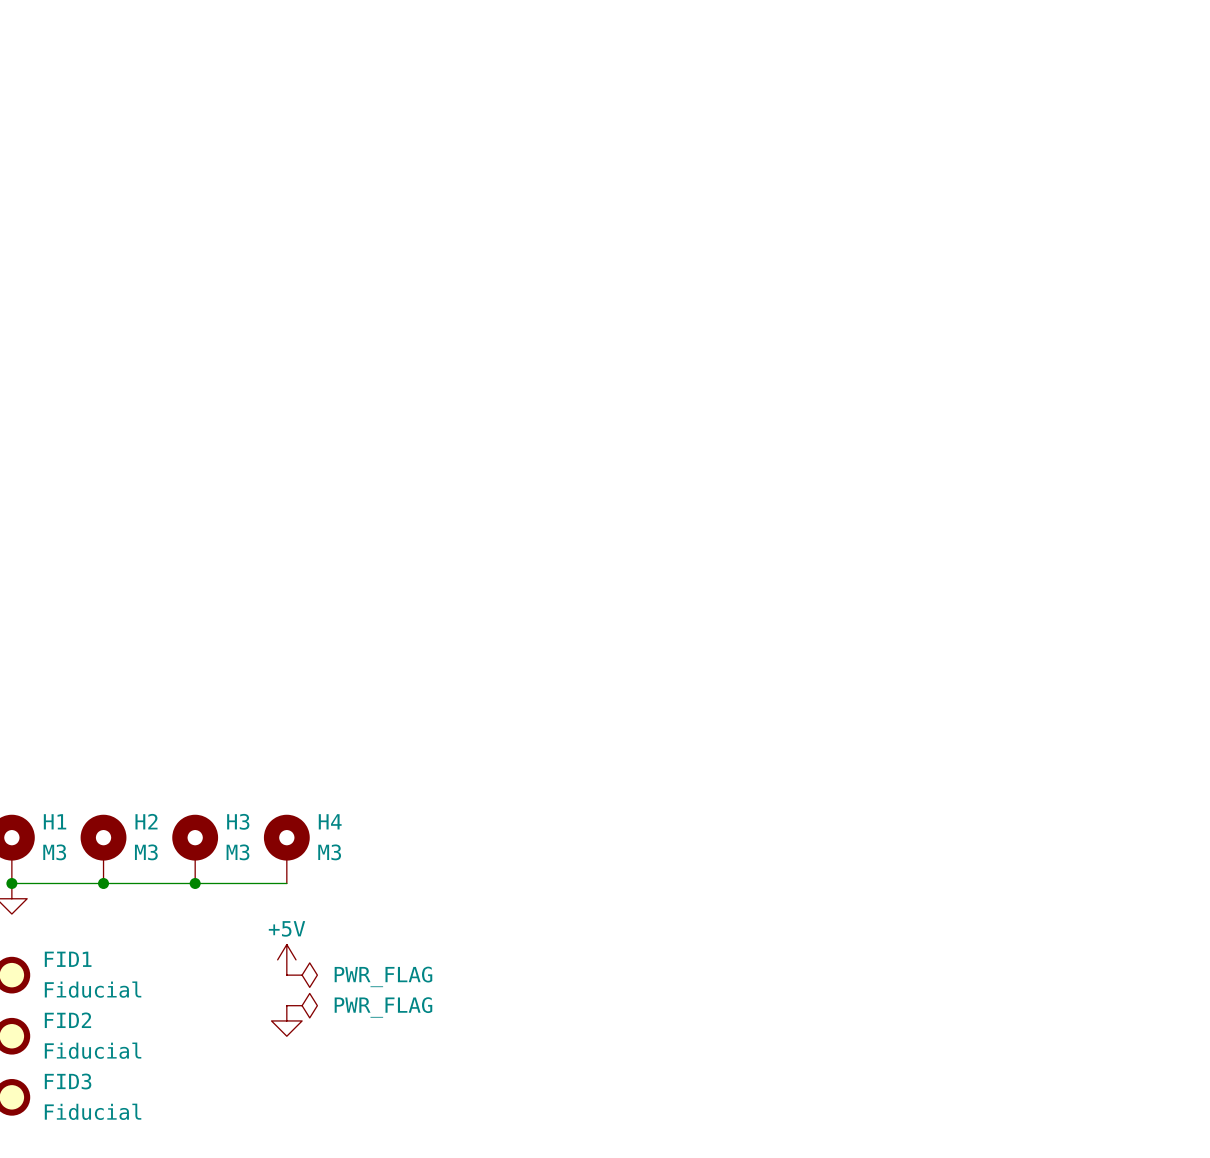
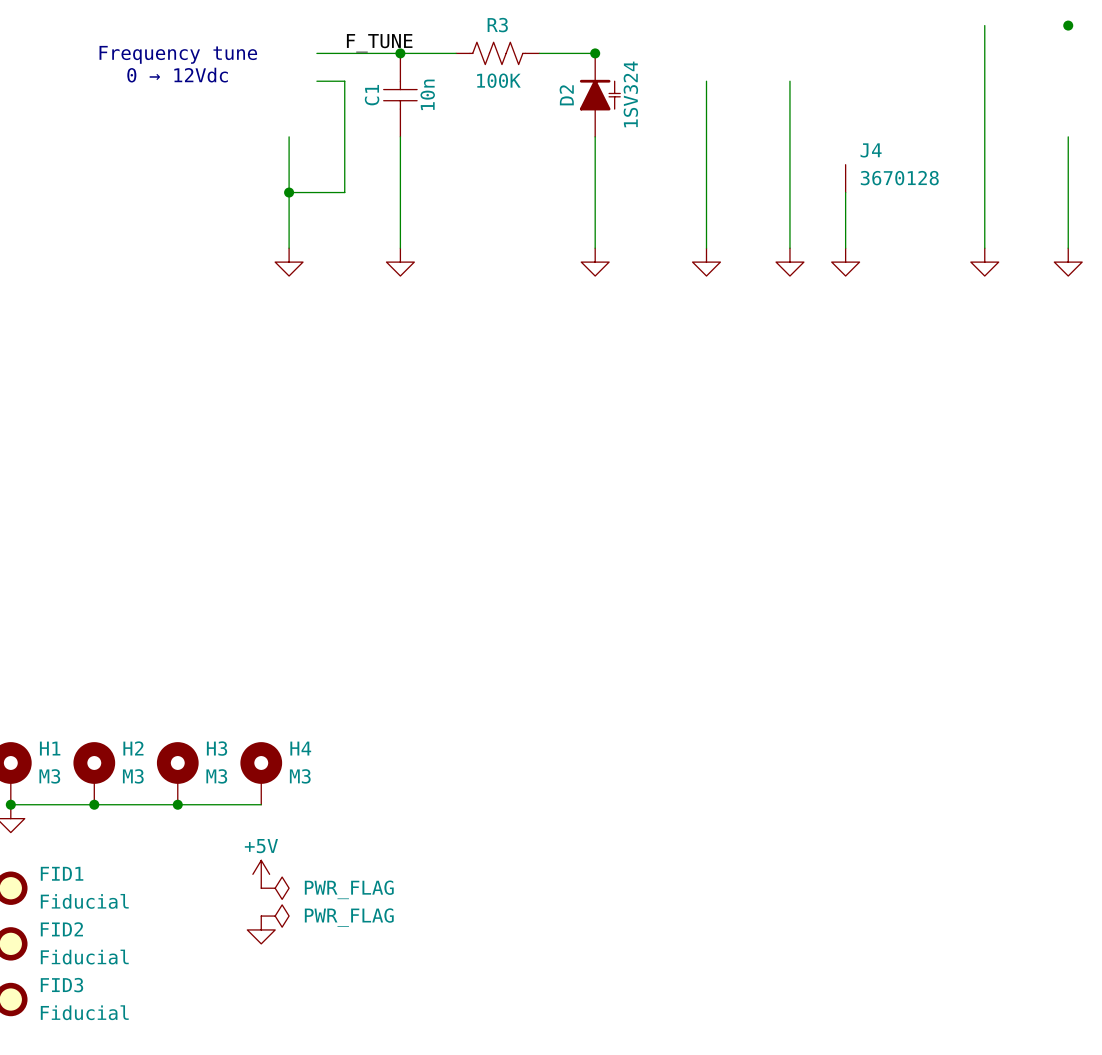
wire: none -> (984, 25) (984, 248)
junction: none -> (1068, 25)
label: none -> F_TUNE (379, 43)
wire: none -> (316, 53) (456, 53)
junction: none -> (400, 53)
R3: none -> 100K (497, 53)
wire: none -> (539, 53) (595, 53)
junction: none -> (595, 53)
text: none -> Frequency tune (178, 54)
text: none -> 0 → 12Vdc (177, 75)
wire: none -> (316, 81) (344, 81) (344, 192) (289, 192)
wire: none -> (706, 81) (706, 248)
wire: none -> (789, 81) (789, 248)
C1: none -> 10n (400, 95)
D2: none -> 1SV324 (600, 95)
wire: none -> (289, 136) (289, 248)
wire: none -> (400, 136) (400, 248)
wire: none -> (595, 136) (595, 248)
wire: none -> (1068, 136) (1068, 248)
J4: none -> 3670128 (845, 178)
junction: none -> (289, 192)
wire: none -> (845, 192) (845, 248)
power symbol: none -> (289, 262)
power symbol: none -> (400, 262)
power symbol: none -> (595, 262)
power symbol: none -> (706, 262)
power symbol: none -> (789, 262)
power symbol: none -> (845, 262)
power symbol: none -> (984, 262)
power symbol: none -> (1068, 262)

